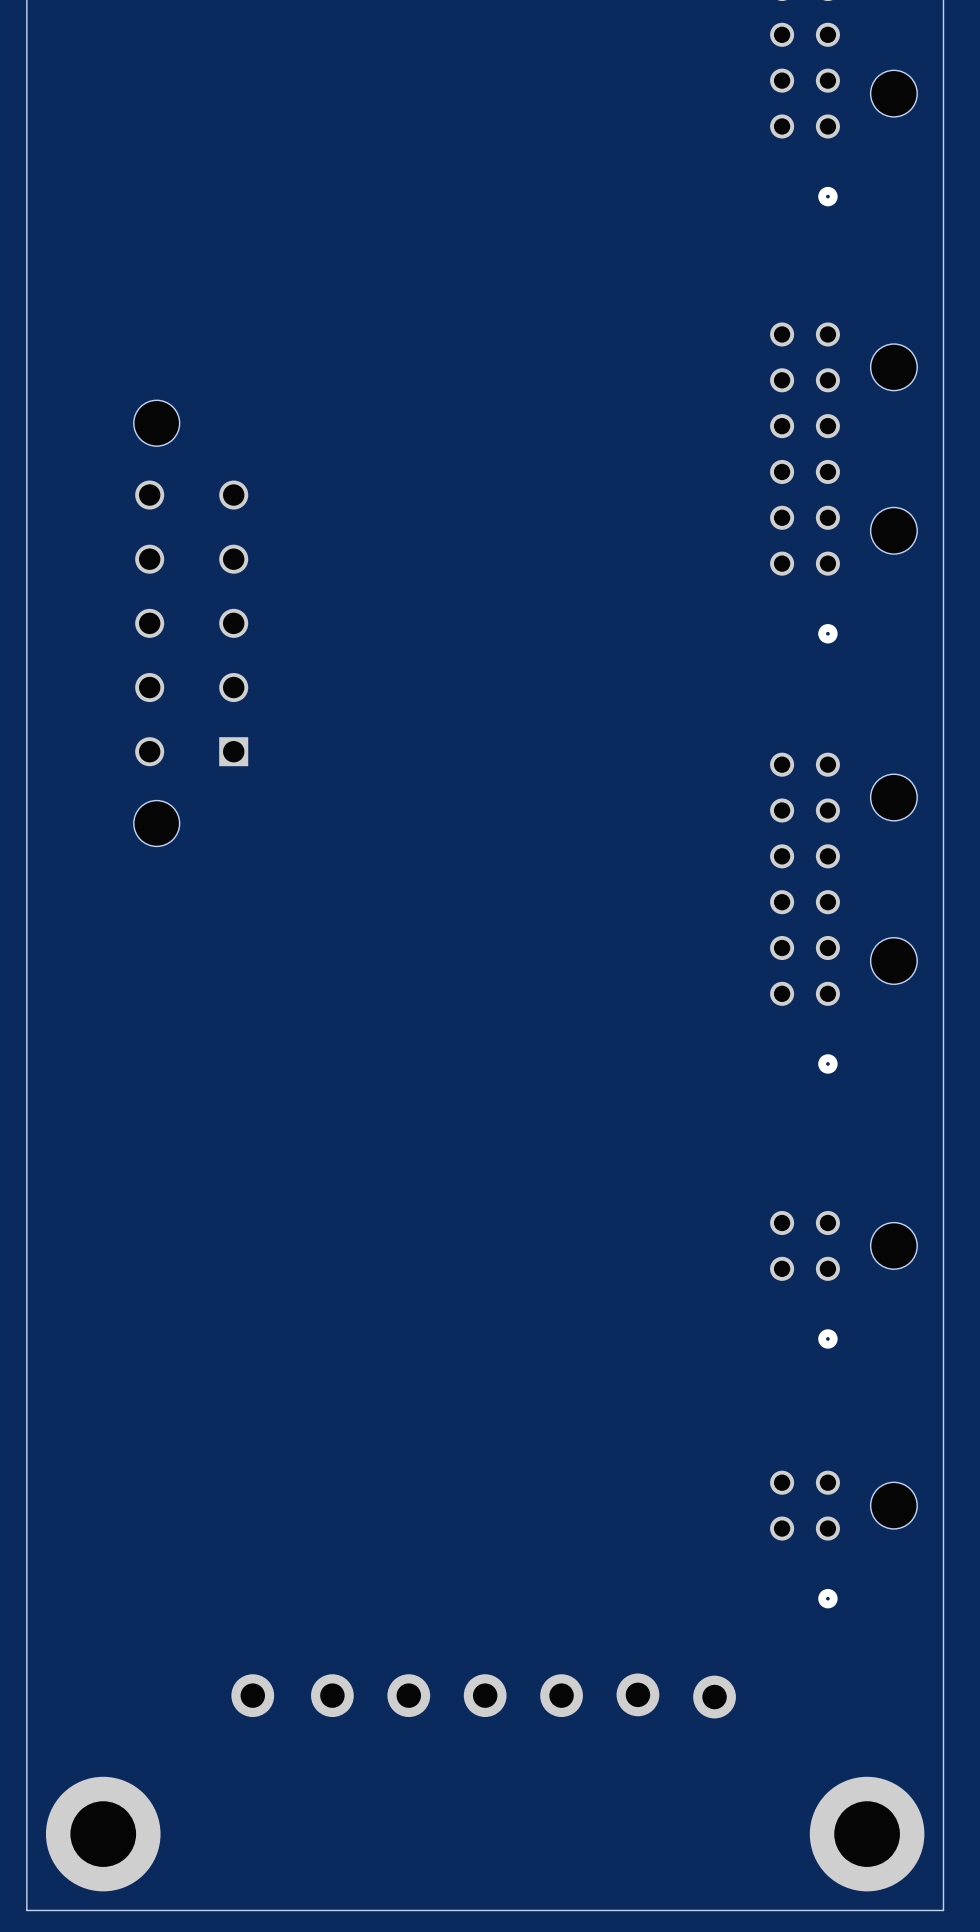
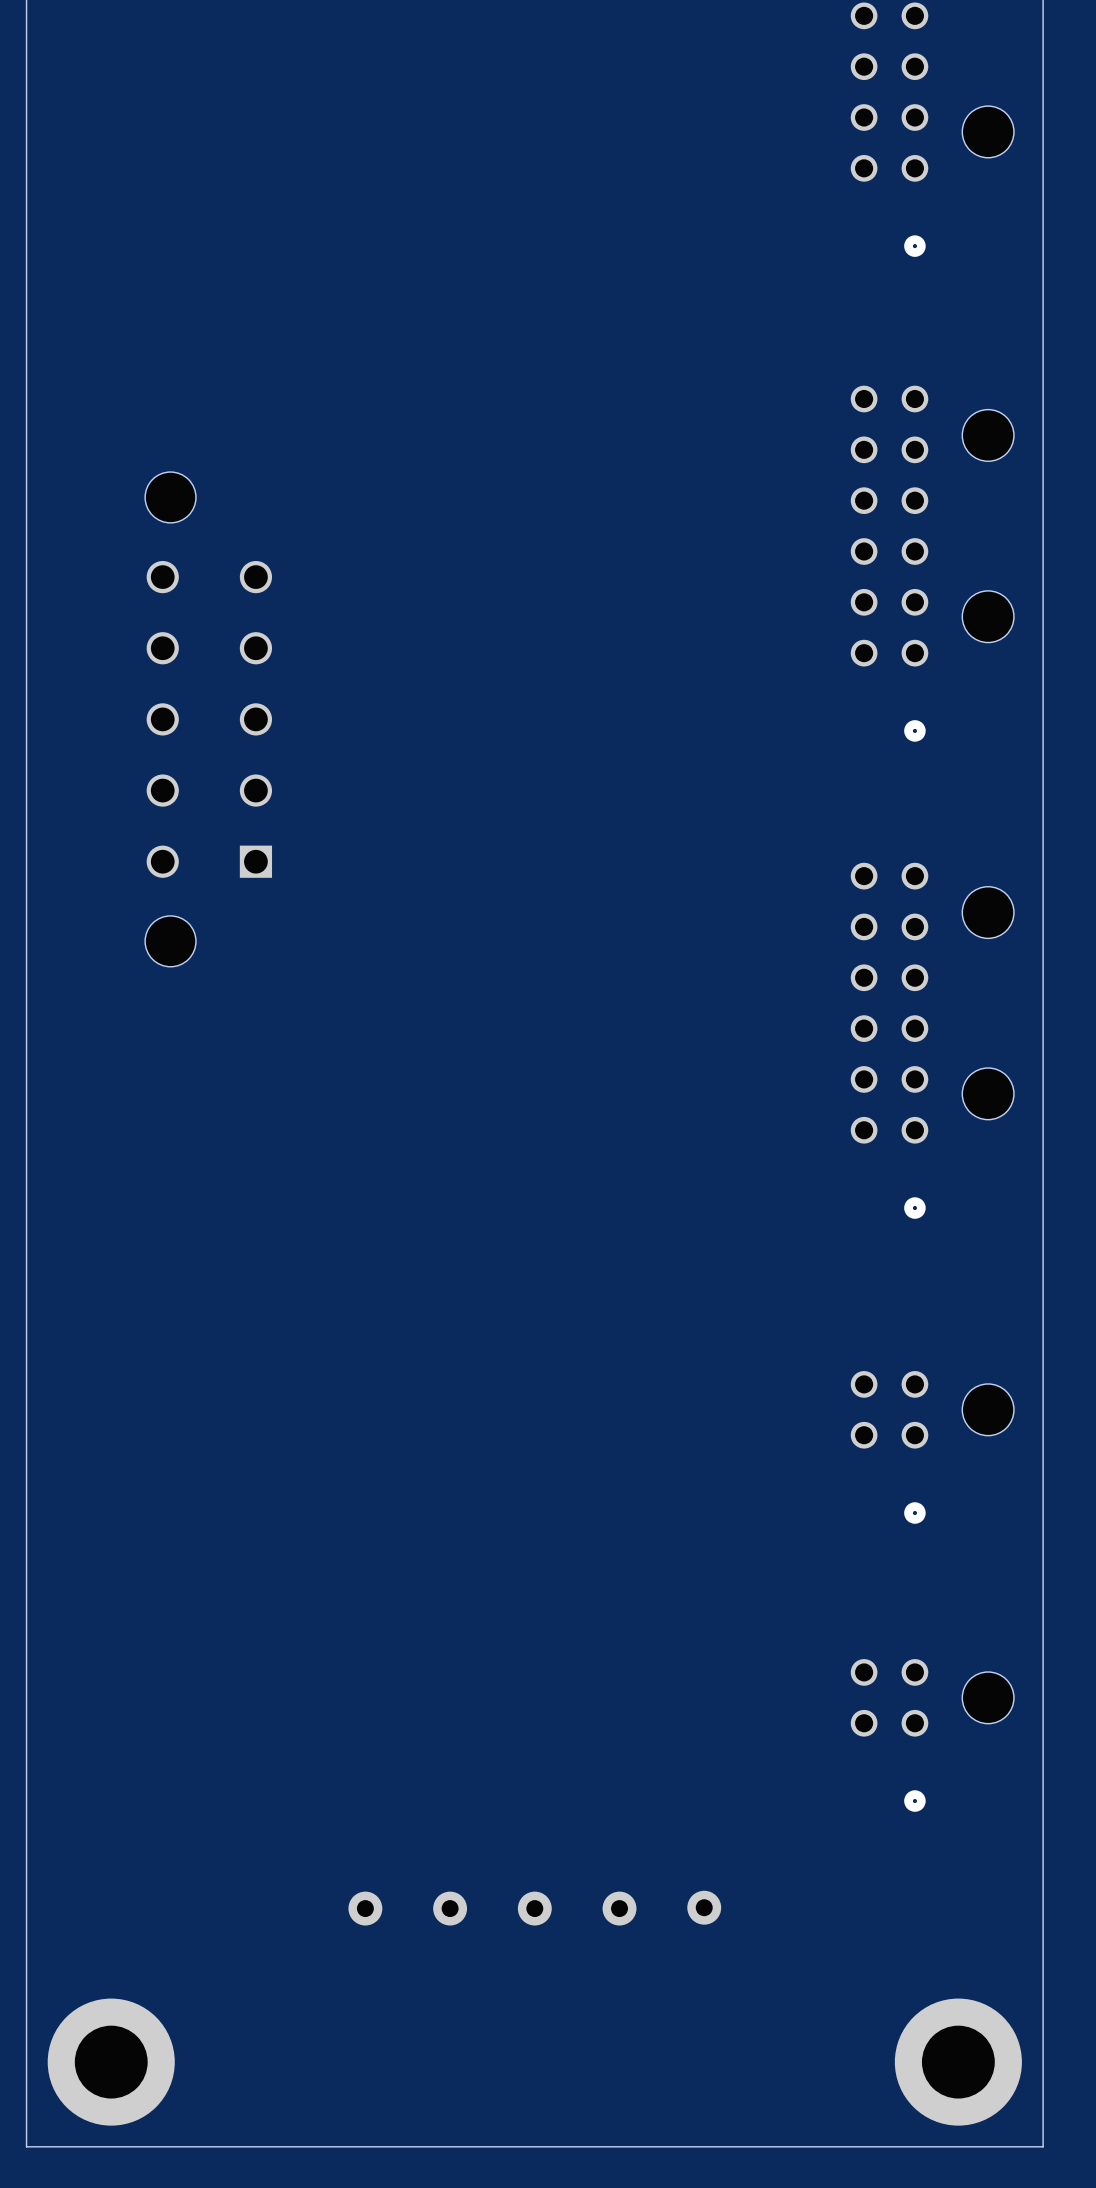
part footprint: [616, 1673, 660, 1717] -> [687, 1890, 722, 1925]
part footprint: [311, 1674, 354, 1718] -> [348, 1891, 383, 1926]
part footprint: [387, 1674, 431, 1718] -> [433, 1891, 468, 1926]
part footprint: [463, 1674, 507, 1718] -> [517, 1891, 552, 1926]
part footprint: [540, 1674, 583, 1718] -> [602, 1891, 637, 1926]
part: (252, 1695) -> none
part: (714, 1697) -> none

